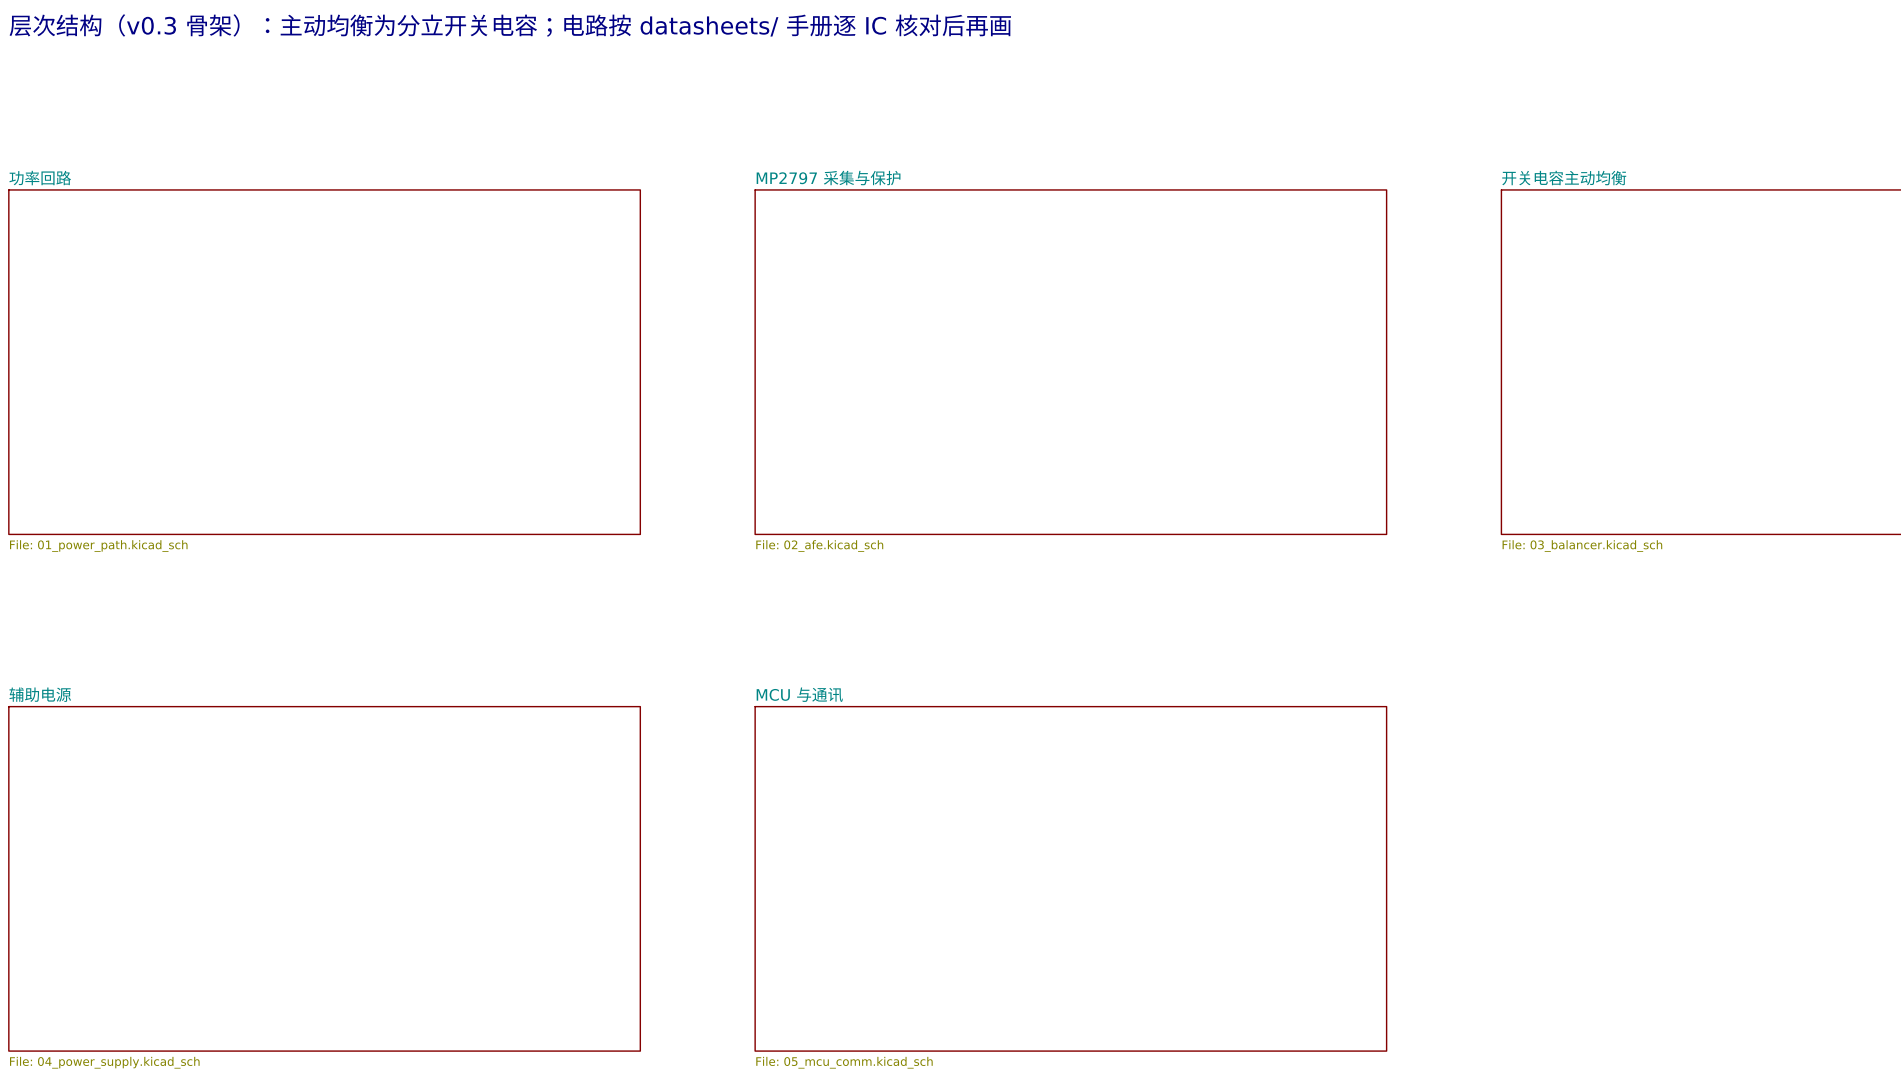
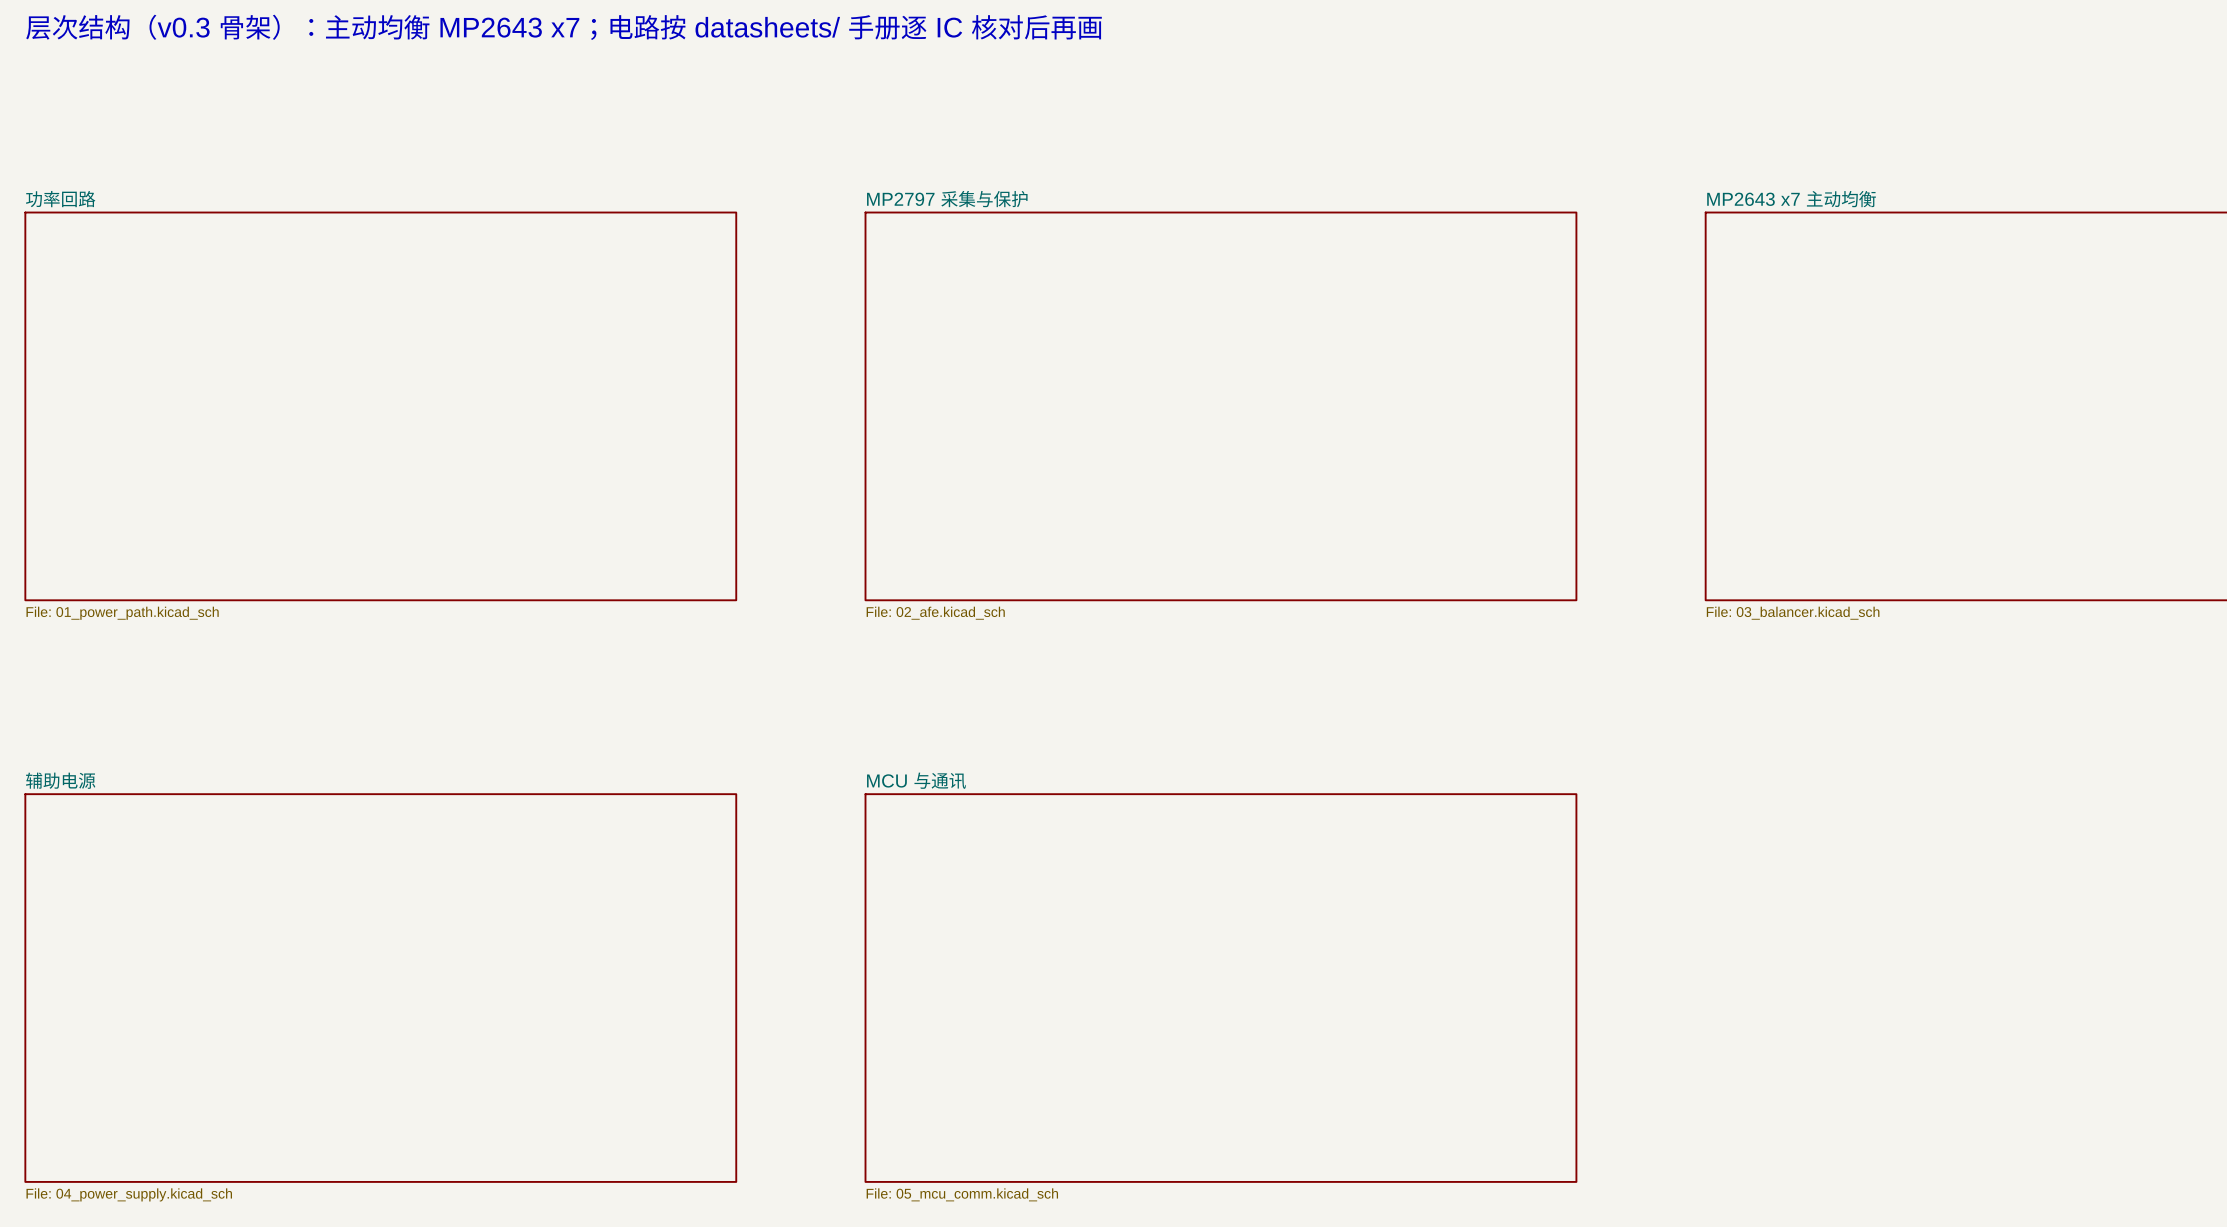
text: 层次结构（v0.3 骨架）：主动均衡为分立开关电容；电路按 datasheets/ 手册逐 IC 核对后再画 (510, 25) -> 层次结构（v0.3 骨架）：主动均衡 MP2643 x7；电路按 datasheets/ 手册逐 IC 核对后再画 (563, 27)
sheet 开关电容主动均衡 name: 开关电容主动均衡 (1564, 178) -> MP2643 x7 主动均衡 (1791, 199)

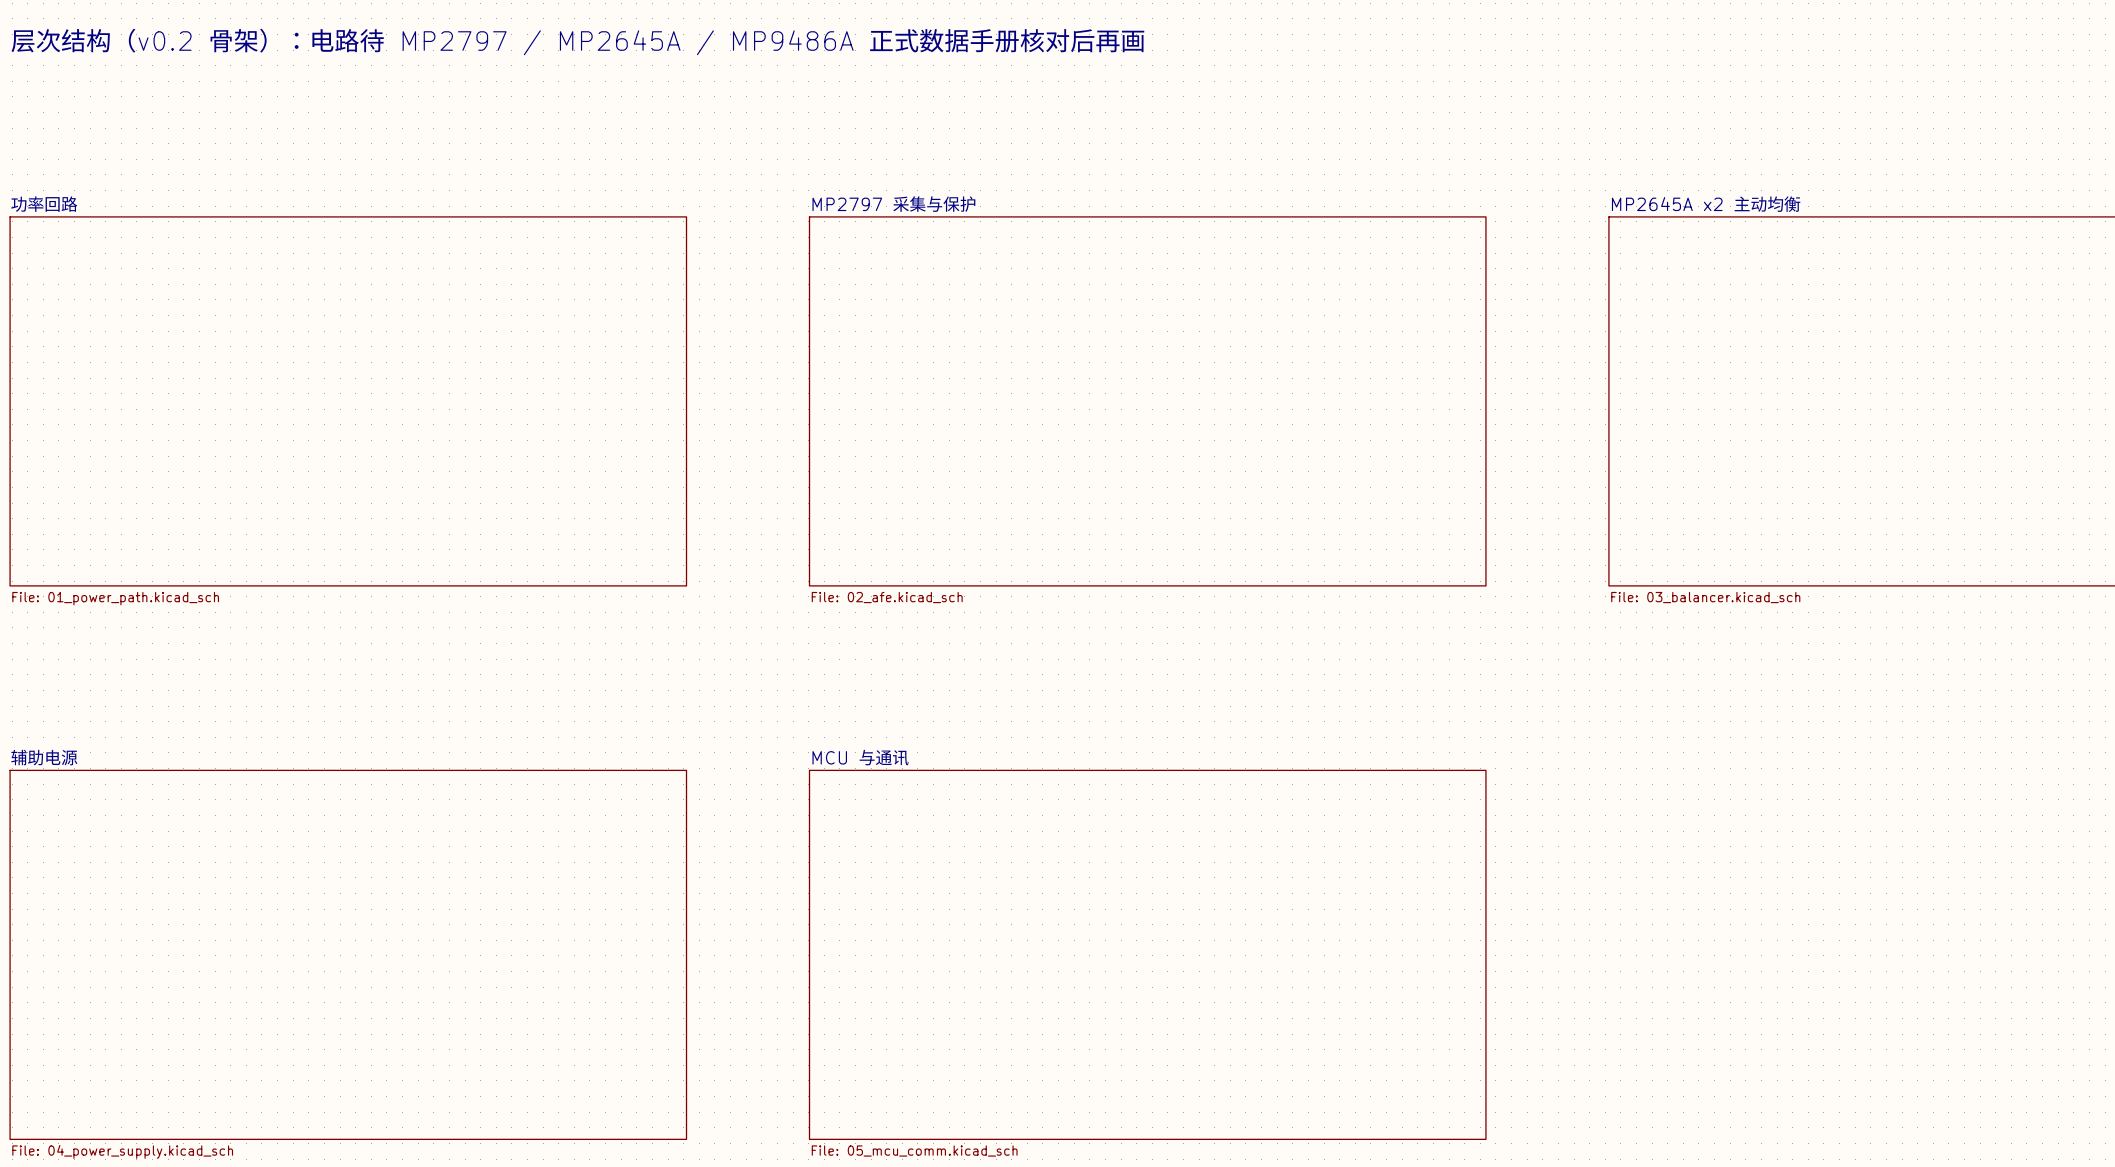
text: 层次结构（v0.3 骨架）：主动均衡 MP2643 x7；电路按 datasheets/ 手册逐 IC 核对后再画 (563, 27) -> 层次结构（v0.2 骨架）：电路待 MP2797 / MP2645A / MP9486A 正式数据手册核对后再画 (577, 41)
sheet MP2643 x7 主动均衡 name: MP2643 x7 主动均衡 (1791, 199) -> MP2645A x2 主动均衡 (1706, 204)

